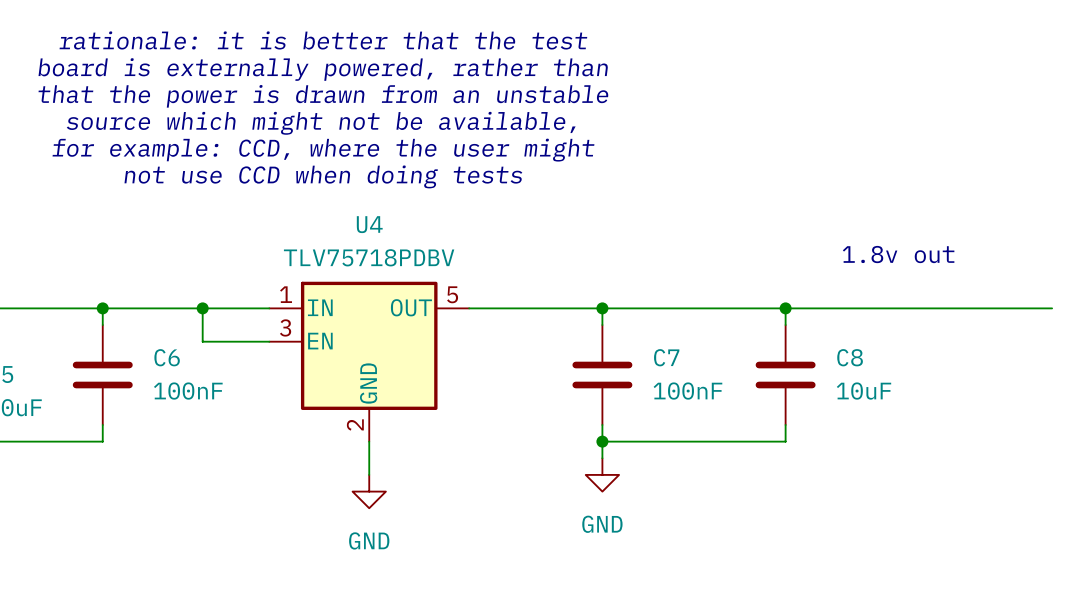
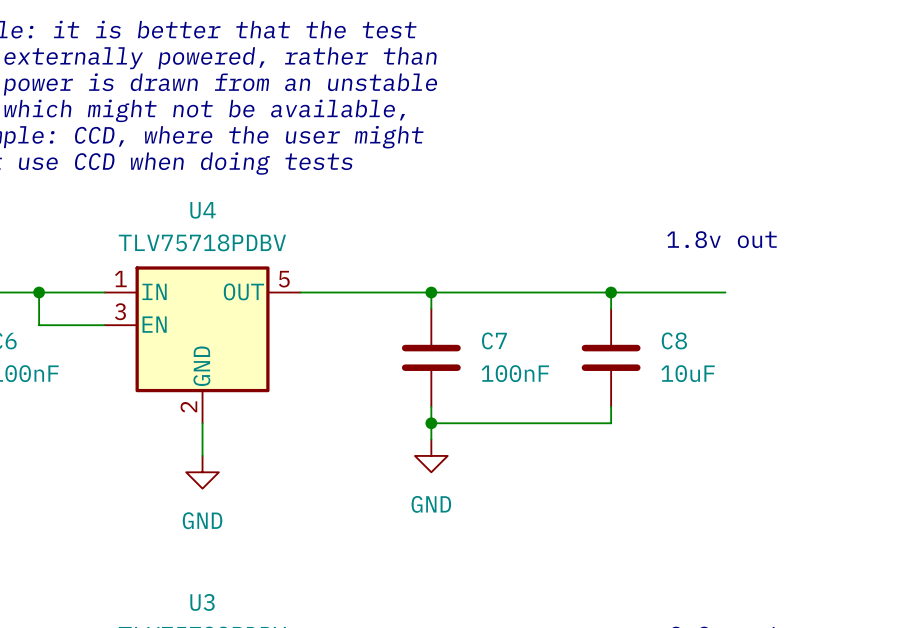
wire: (902, 308) (1052, 308) -> none

